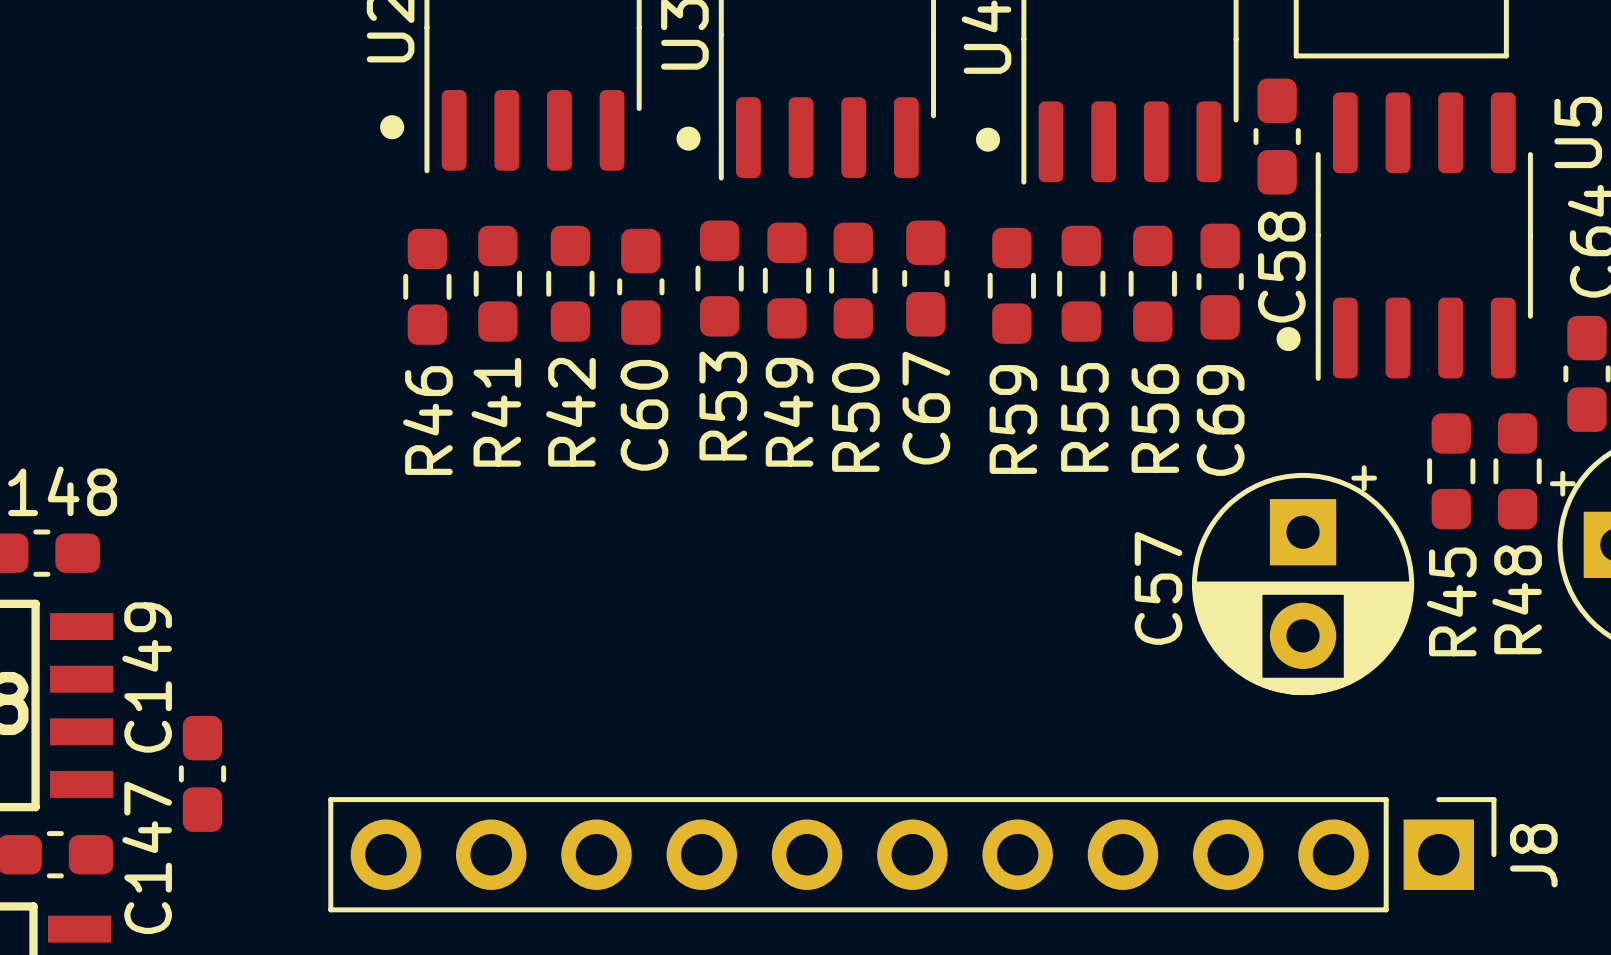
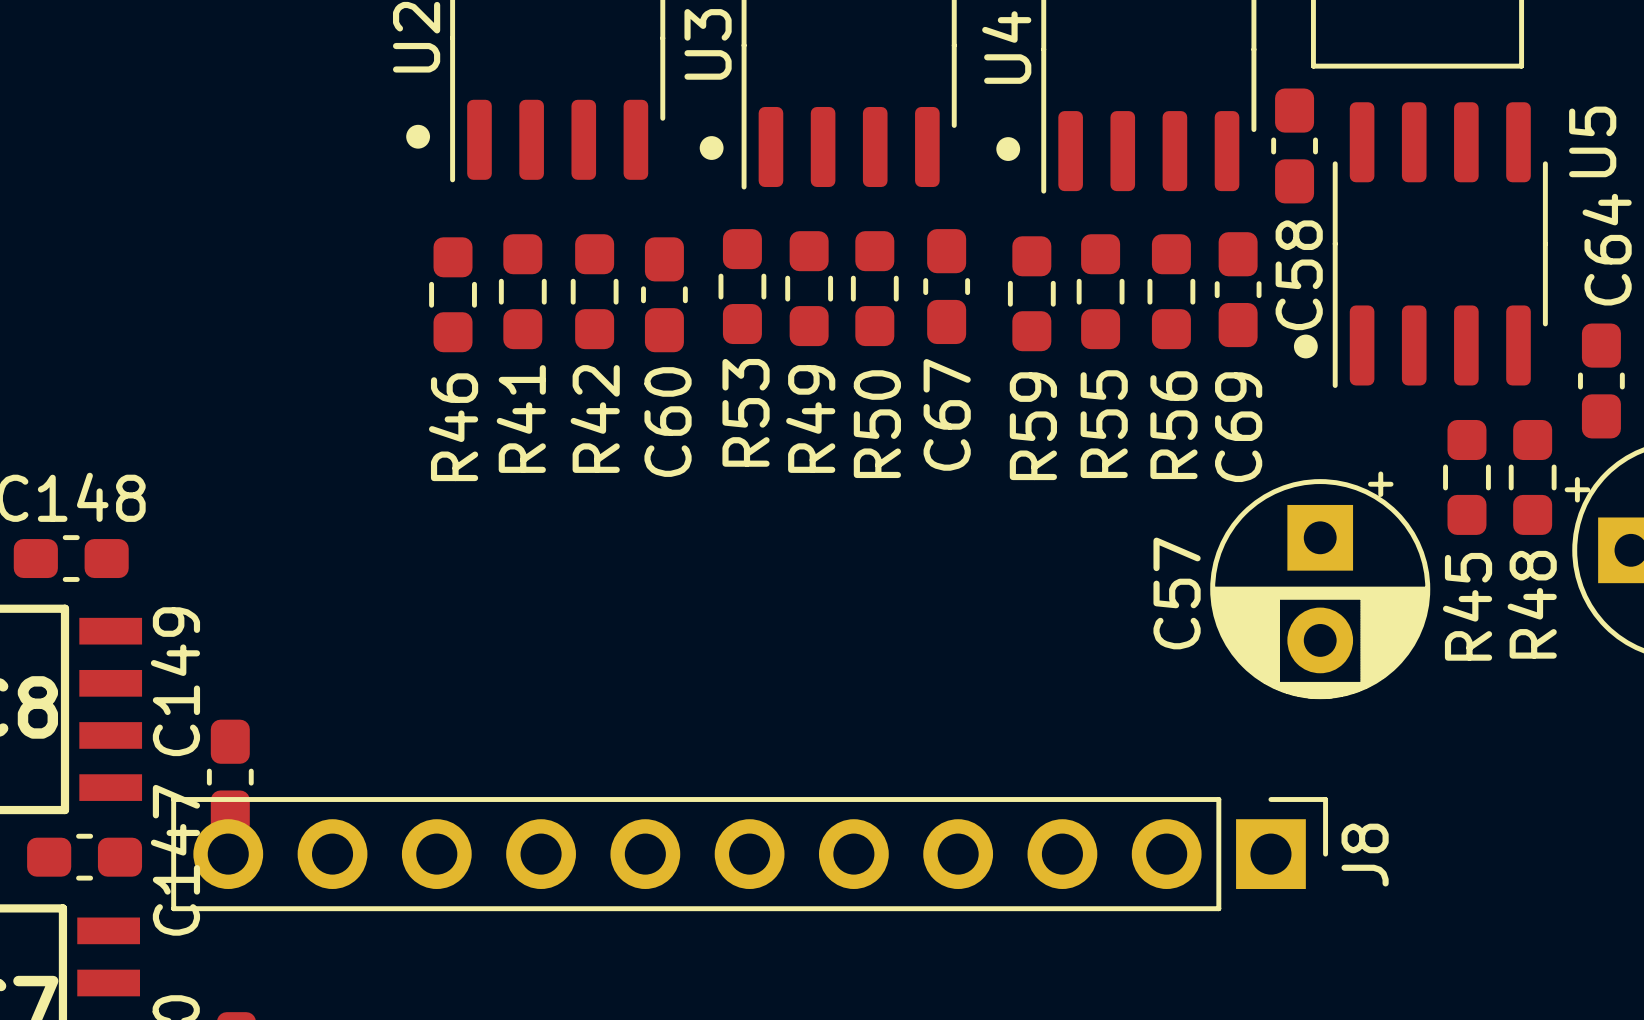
J8 position: (912, 854) -> (749, 854)

